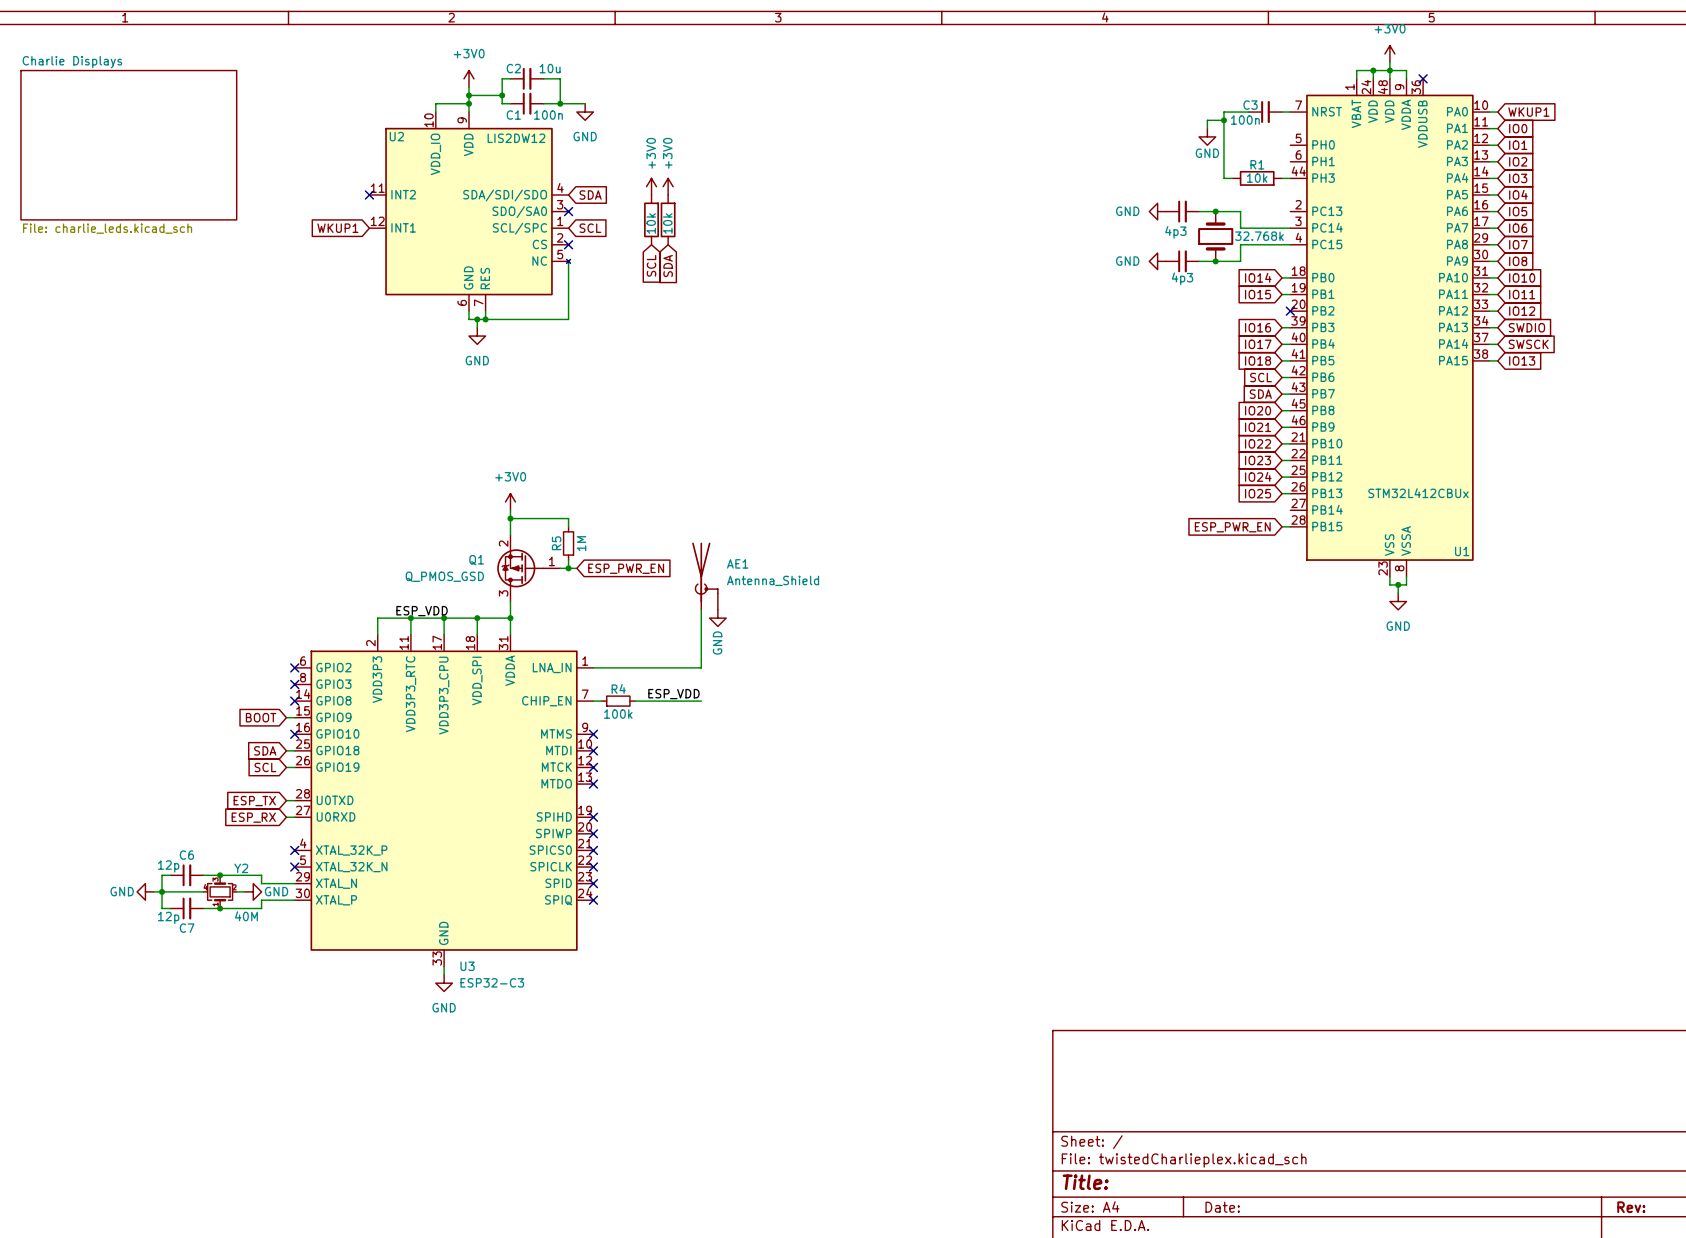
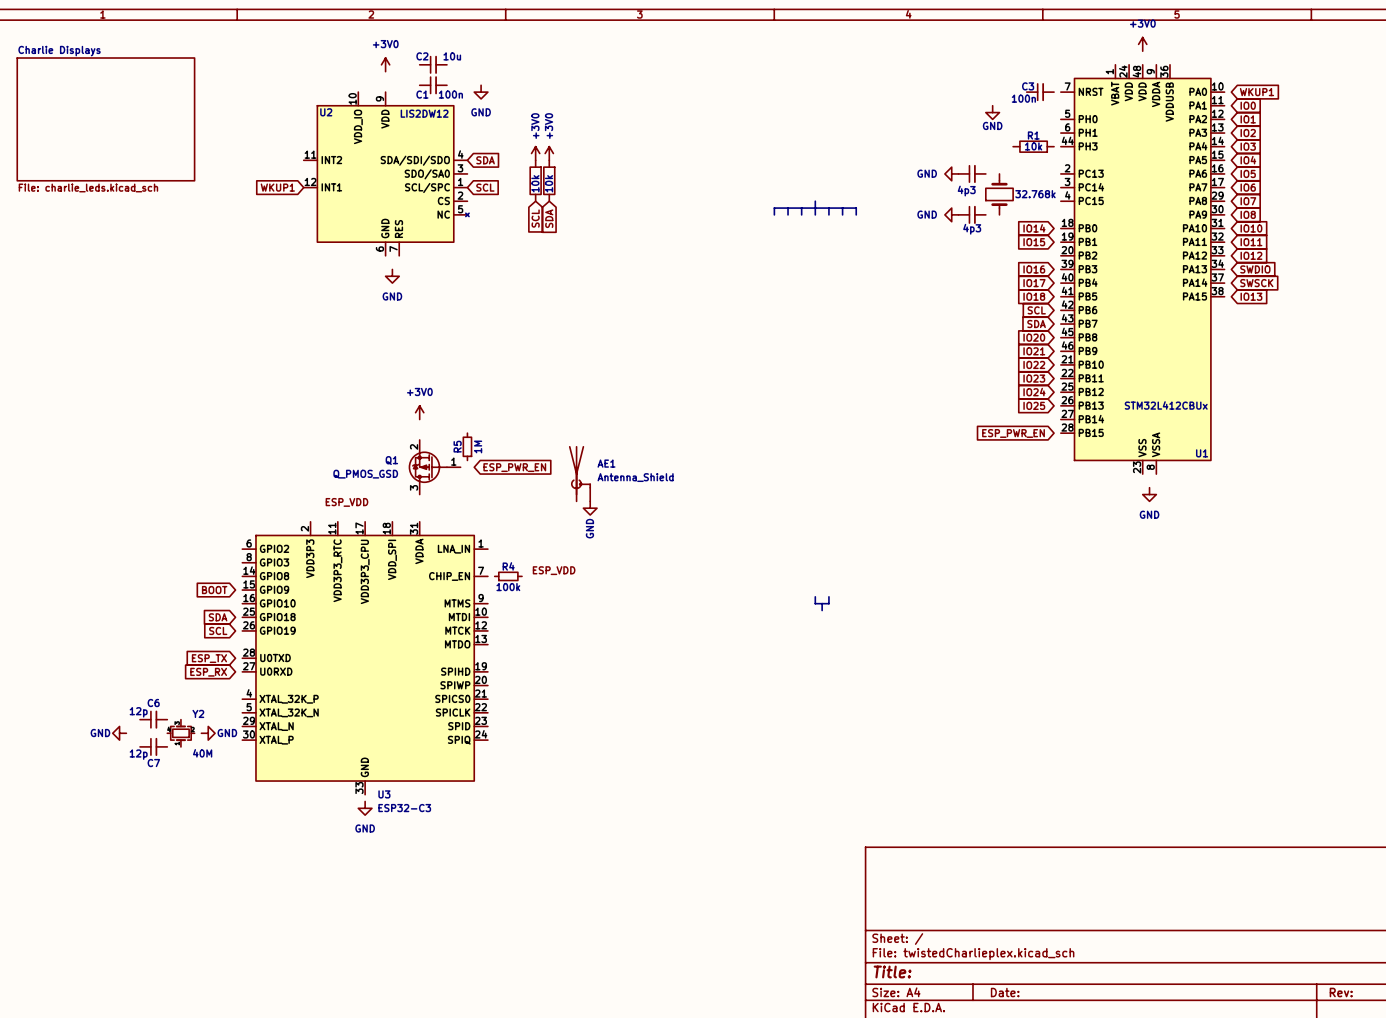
wire: (1389, 62) (1389, 78) -> none
wire: (1373, 70) (1373, 78) -> none
junction: (1373, 70) -> none
junction: (1389, 70) -> none
wire: (510, 78) (502, 78) (502, 103) (510, 103) -> none
wire: (543, 78) (560, 78) (560, 103) -> none
wire: (1356, 78) (1356, 70) (1406, 70) (1406, 78) -> none
no-connect mark: (1423, 78) -> none
wire: (468, 87) (468, 112) -> none
wire: (468, 95) (502, 95) -> none
junction: (468, 95) -> none
junction: (502, 95) -> none
wire: (468, 103) (435, 103) (435, 112) -> none
junction: (468, 103) -> none
wire: (543, 103) (585, 103) -> none
junction: (560, 103) -> none
wire: (1248, 112) (1223, 112) (1223, 178) (1232, 178) -> none
wire: (1282, 112) (1290, 112) -> none
wire: (1489, 112) (1497, 112) -> none
wire: (1223, 120) (1207, 120) (1207, 128) -> none
junction: (1223, 120) -> none
wire: (1489, 128) (1497, 128) -> none
wire: (1489, 145) (1497, 145) -> none
wire: (1489, 161) (1497, 161) -> none
wire: (1282, 178) (1290, 178) -> none
wire: (1489, 178) (1497, 178) -> none
no-connect mark: (369, 195) -> none
wire: (1489, 195) (1497, 195) -> none
no-connect mark: (568, 211) -> none
wire: (1199, 211) (1240, 211) (1240, 228) (1290, 228) -> none
junction: (1215, 211) -> none
wire: (1489, 211) (1497, 211) -> none
wire: (1489, 228) (1497, 228) -> none
no-connect mark: (568, 244) -> none
wire: none -> (815, 201) (815, 214)
wire: (1290, 244) (1240, 244) (1240, 261) (1199, 261) -> none
wire: (1489, 244) (1497, 244) -> none
wire: none -> (788, 208) (788, 214)
wire: none -> (801, 208) (801, 214)
wire: none -> (828, 208) (828, 214)
wire: none -> (842, 208) (842, 214)
wire: (568, 261) (568, 319) (468, 319) (468, 311) -> none
wire: none -> (774, 214) (774, 208) (856, 208) (856, 214)
junction: (1215, 261) -> none
wire: (1489, 261) (1497, 261) -> none
wire: (1282, 277) (1290, 277) -> none
wire: (1489, 277) (1497, 277) -> none
wire: (1282, 294) (1290, 294) -> none
wire: (1489, 294) (1497, 294) -> none
wire: (485, 311) (485, 319) -> none
no-connect mark: (1290, 311) -> none
wire: (1489, 311) (1497, 311) -> none
wire: (477, 319) (477, 327) -> none
junction: (477, 319) -> none
junction: (485, 319) -> none
wire: (1282, 327) (1290, 327) -> none
wire: (1489, 327) (1497, 327) -> none
wire: (1282, 344) (1290, 344) -> none
wire: (1489, 344) (1497, 344) -> none
wire: (1282, 360) (1290, 360) -> none
wire: (1489, 360) (1497, 360) -> none
wire: (1282, 377) (1290, 377) -> none
wire: (1282, 394) (1290, 394) -> none
wire: (1282, 410) (1290, 410) -> none
wire: (1282, 427) (1290, 427) -> none
wire: (1282, 443) (1290, 443) -> none
wire: (1282, 460) (1290, 460) -> none
wire: (1282, 477) (1290, 477) -> none
wire: (1282, 493) (1290, 493) -> none
wire: (510, 510) (510, 535) -> none
wire: (510, 518) (568, 518) (568, 526) -> none
junction: (510, 518) -> none
wire: (1282, 526) (1290, 526) -> none
wire: (568, 560) (568, 568) -> none
wire: (560, 568) (576, 568) -> none
junction: (568, 568) -> none
wire: (1389, 576) (1389, 584) (1406, 584) (1406, 576) -> none
wire: (1398, 584) (1398, 593) -> none
junction: (1398, 584) -> none
wire: (510, 601) (510, 634) -> none
wire: (701, 609) (701, 667) (593, 667) -> none
wire: (410, 618) (410, 634) -> none
junction: (410, 618) -> none
wire: (444, 618) (444, 634) -> none
junction: (444, 618) -> none
wire: (477, 618) (477, 634) -> none
junction: (477, 618) -> none
wire: (510, 618) (377, 618) (377, 634) -> none
junction: (510, 618) -> none
no-connect mark: (294, 667) -> none
no-connect mark: (294, 684) -> none
no-connect mark: (294, 701) -> none
wire: (593, 701) (601, 701) -> none
wire: (634, 701) (701, 701) -> none
wire: (286, 717) (294, 717) -> none
wire: none -> (815, 596) (815, 603) (828, 603) (828, 596)
no-connect mark: (294, 734) -> none
no-connect mark: (593, 734) -> none
wire: none -> (822, 603) (822, 610)
wire: (286, 750) (294, 750) -> none
no-connect mark: (593, 750) -> none
wire: (286, 767) (294, 767) -> none
no-connect mark: (593, 767) -> none
no-connect mark: (593, 784) -> none
wire: (286, 800) (294, 800) -> none
wire: (286, 817) (294, 817) -> none
no-connect mark: (593, 817) -> none
no-connect mark: (593, 833) -> none
no-connect mark: (294, 850) -> none
no-connect mark: (593, 850) -> none
no-connect mark: (294, 867) -> none
no-connect mark: (593, 867) -> none
wire: (170, 875) (162, 875) (162, 908) (170, 908) -> none
wire: (203, 875) (261, 875) (261, 883) (294, 883) -> none
junction: (220, 875) -> none
no-connect mark: (593, 883) -> none
wire: (153, 891) (203, 891) -> none
junction: (162, 891) -> none
wire: (236, 891) (244, 891) -> none
wire: (294, 900) (261, 900) (261, 908) (203, 908) -> none
no-connect mark: (593, 900) -> none
junction: (220, 908) -> none
wire: (444, 966) (444, 974) -> none

